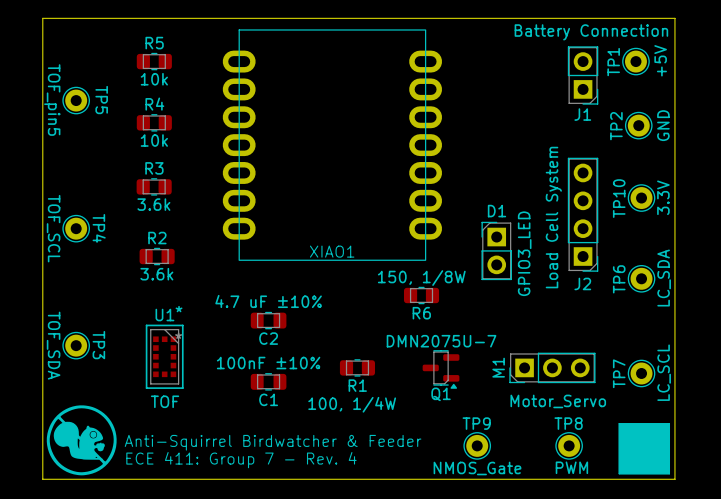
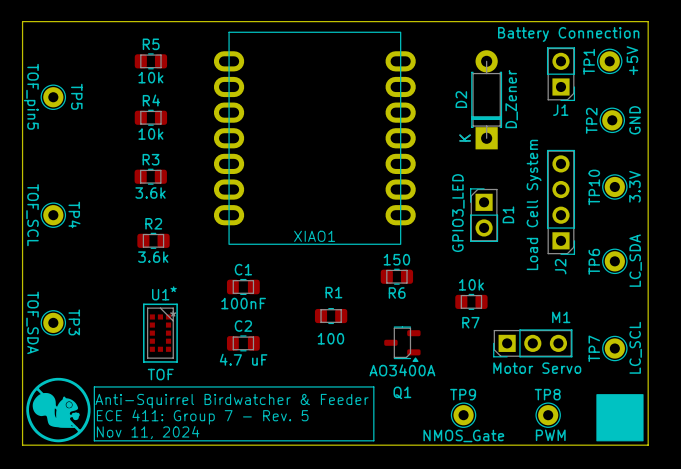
board edge: (42, 18) (42, 479) (674, 479) (674, 18) -> (48, 21) (22, 21) (22, 445) (648, 445) (648, 21) (630, 21)
TP1 position: (635, 61) -> (609, 61)
J1 position: (583, 75) -> (561, 74)
TP5 position: (76, 100) -> (53, 97)
D2: none -> D_Zener (486, 99)
TP2 position: (638, 125) -> (612, 120)
TP10 position: (641, 198) -> (614, 186)
D1 name rotation: 0° (496, 211) -> 90° counterclockwise (508, 214)
D1 name position: D1 (496, 211) -> D1 (508, 214)
J2 position: (583, 214) -> (561, 202)
TP4 position: (76, 228) -> (53, 215)
D1 position: (496, 250) -> (484, 215)
D1 value position: GPIO3_LED (524, 253) -> GPIO3_LED (458, 213)
R6 value: 150, 1/8W (421, 278) -> 150 (396, 259)
TP6 position: (641, 278) -> (614, 261)
J2 name rotation: 0° (582, 283) -> 90° counterclockwise (560, 266)
C2 value: 4.7 uF ±10% (268, 301) -> 4.7 uF (243, 359)
C2 position: (268, 320) -> (243, 343)
R7: none -> 10k (471, 301)
C2 name position: C2 (268, 338) -> C2 (243, 326)
Q1 value: DMN2075U-7 (441, 341) -> AO3400A (402, 370)
TP3 position: (76, 345) -> (53, 322)
Q1 footprint: [422, 350, 460, 389] -> [384, 326, 421, 362]
C1 value: 100nF ±10% (268, 363) -> 100nF (243, 303)
R1 position: (357, 367) -> (331, 316)
M1 name rotation: 0° (498, 367) -> 90° clockwise (561, 317)
M1 name position: M1 (498, 367) -> M1 (561, 317)
M1 position: (552, 367) -> (532, 343)
TP7 position: (641, 373) -> (614, 348)
C1 position: (268, 381) -> (243, 286)
R1 name position: R1 (357, 385) -> R1 (333, 292)
Q1 name position: Q1 (441, 394) -> Q1 (402, 392)
C1 name position: C1 (268, 399) -> C1 (243, 269)
M1 value: Motor_Servo (558, 401) -> Motor Servo (537, 368)
R1 value: 100, 1/4W (352, 404) -> 100 (330, 338)
line: none -> (94, 386) (373, 386) (373, 440) (94, 440) (94, 386)
drawing position: (81, 440) -> (58, 410)
text position: Anti-Squirrel Birdwatcher & Feeder (273, 442) -> Anti-Squirrel Birdwatcher & Feeder (232, 401)
TP9 position: (477, 445) -> (463, 415)
TP8 position: (569, 445) -> (548, 415)
drawing position: (644, 448) -> (619, 417)
text: ECE 411: Group 7 - Rev. 4 (241, 460) -> ECE 411: Group 7 - Rev. 5 (202, 417)
text: none -> Nov 11, 2024 (148, 432)

